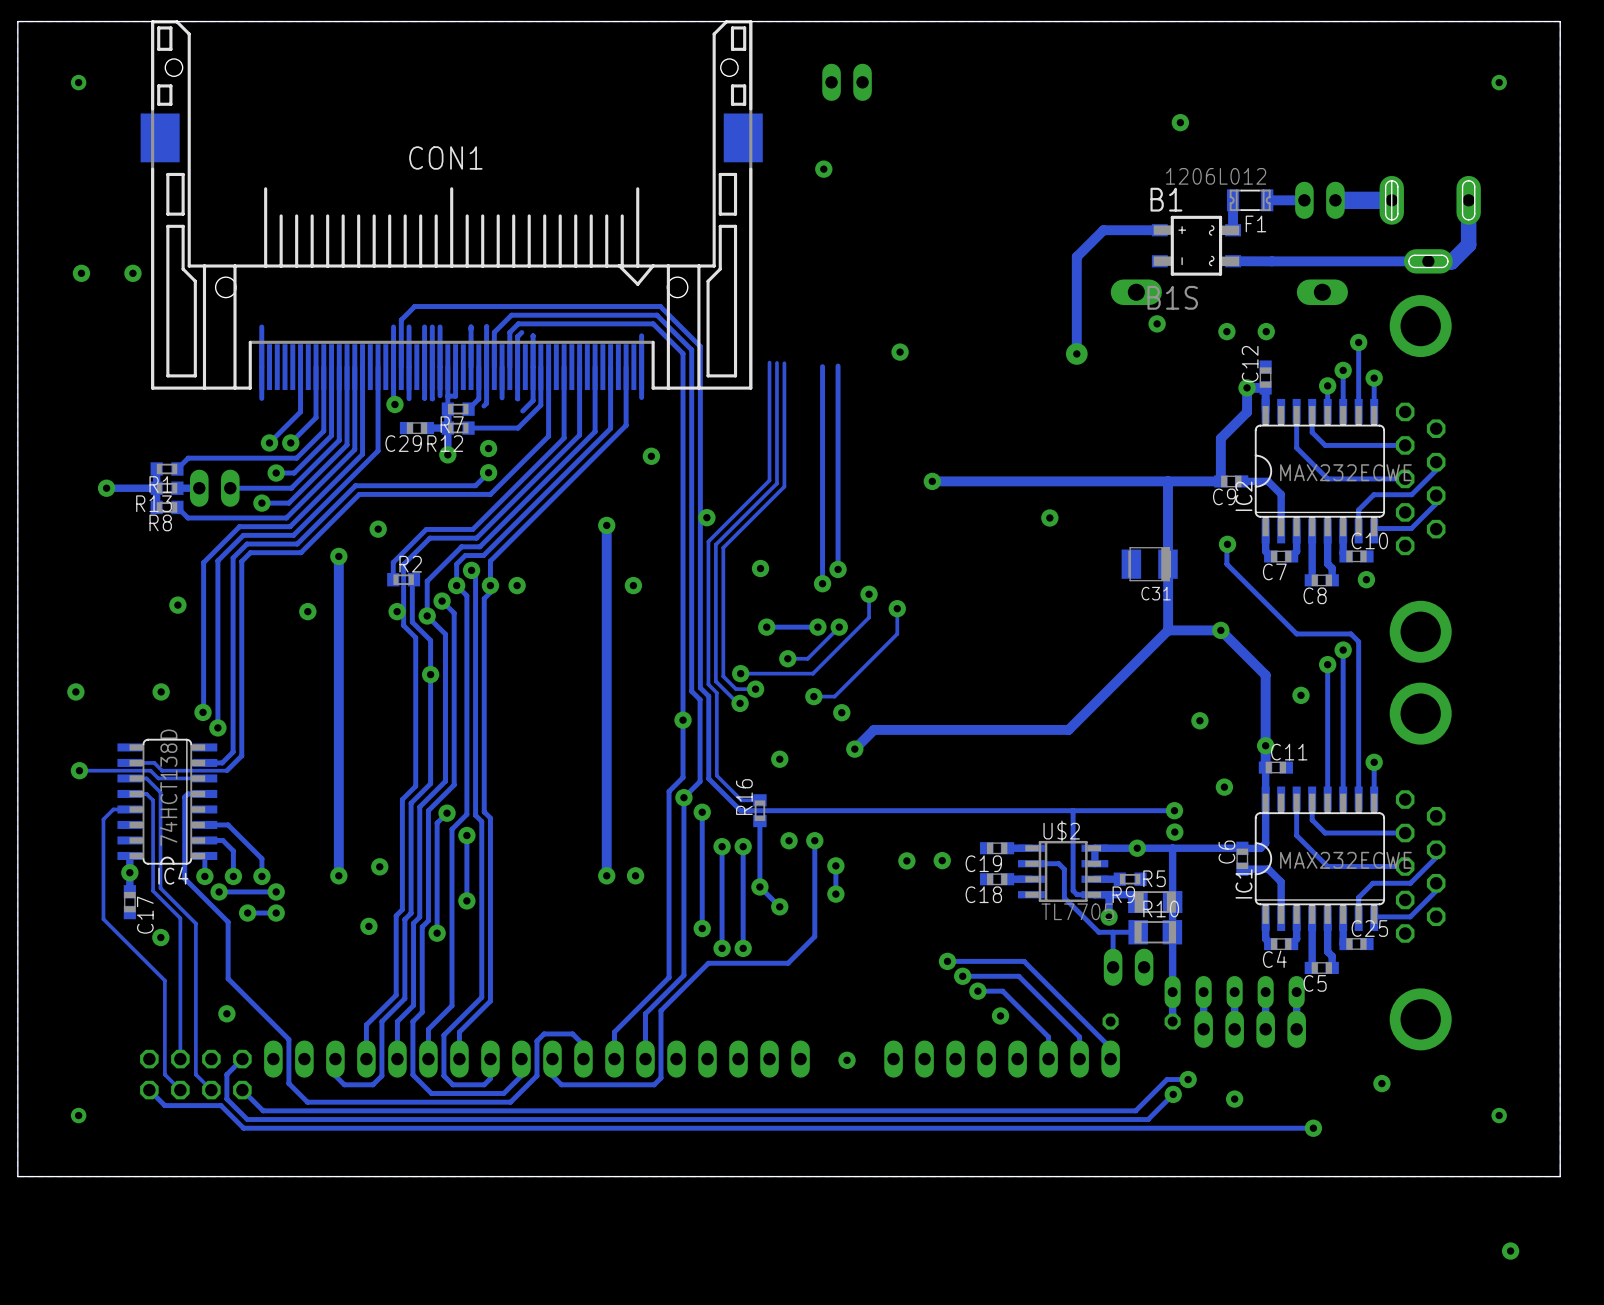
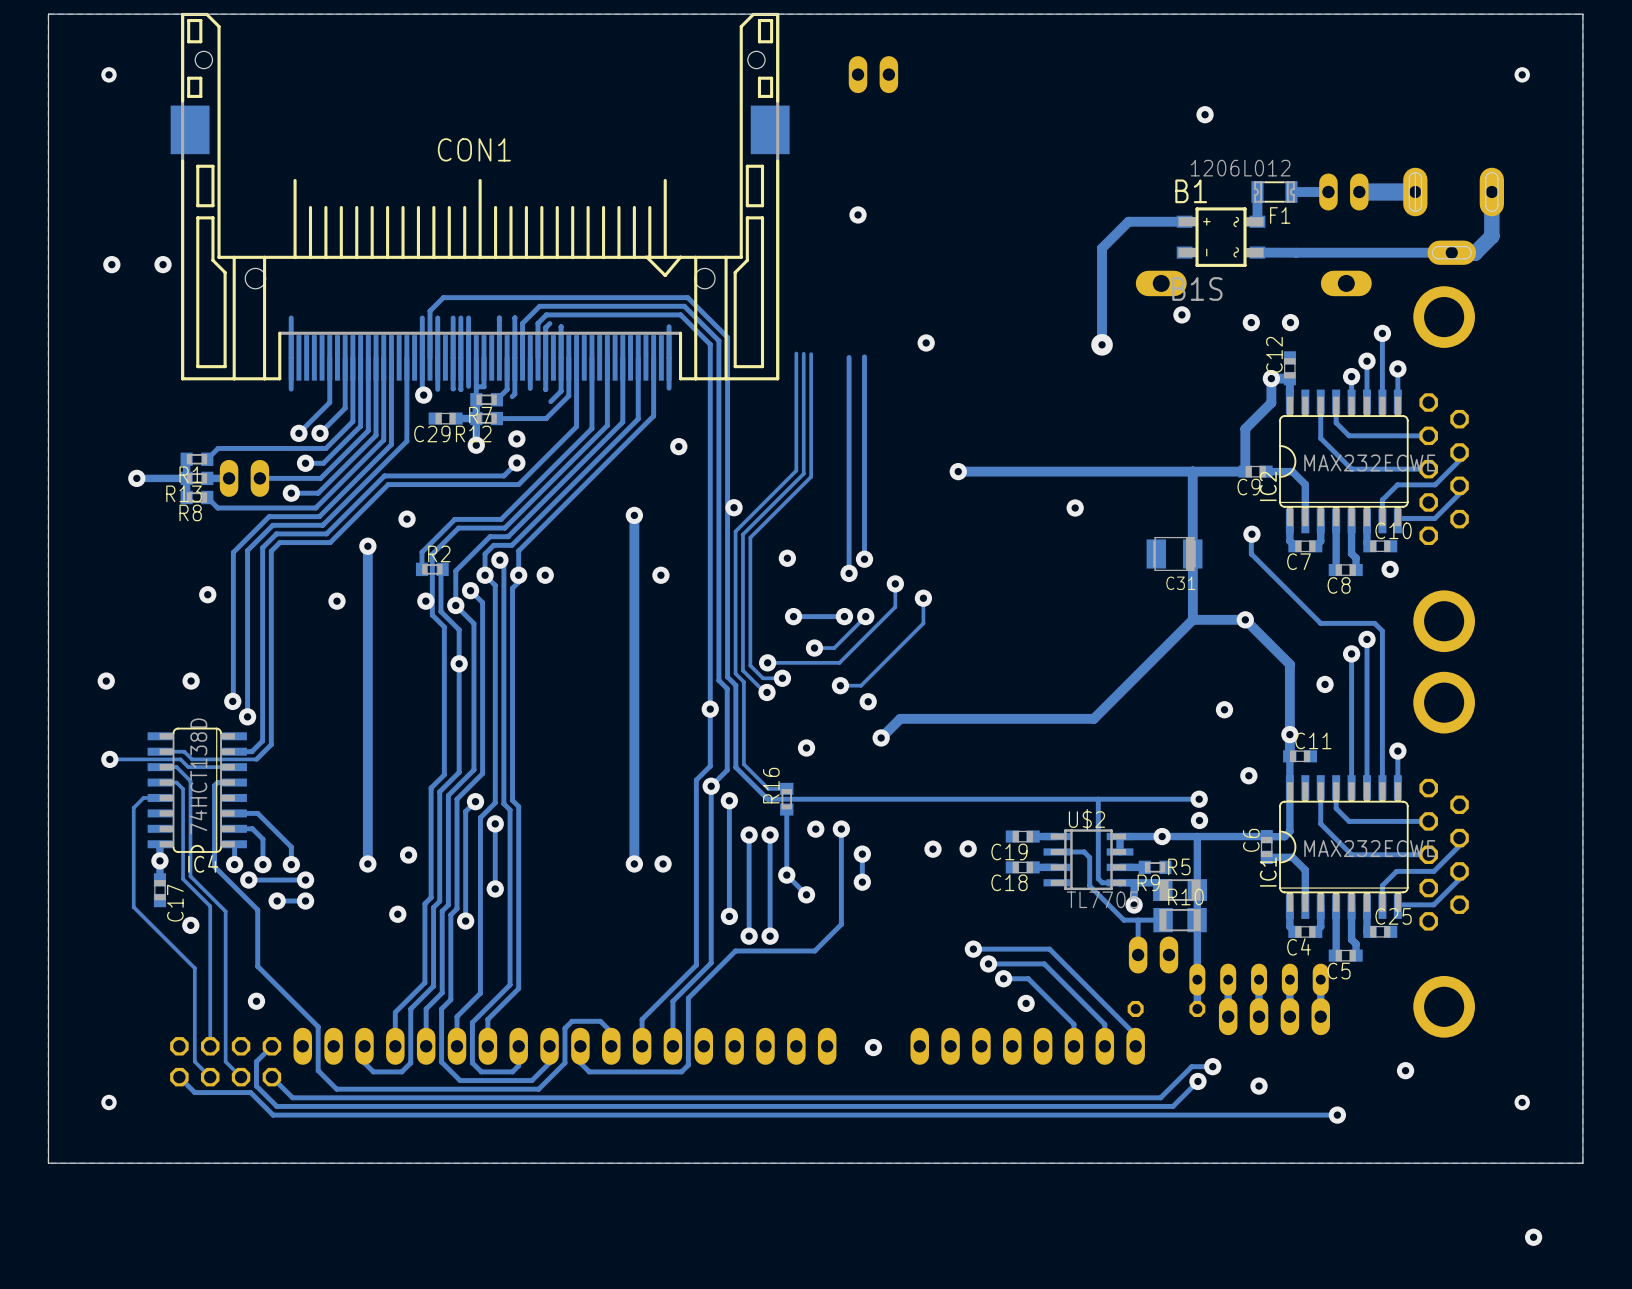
via position: (823, 169) -> (858, 214)

